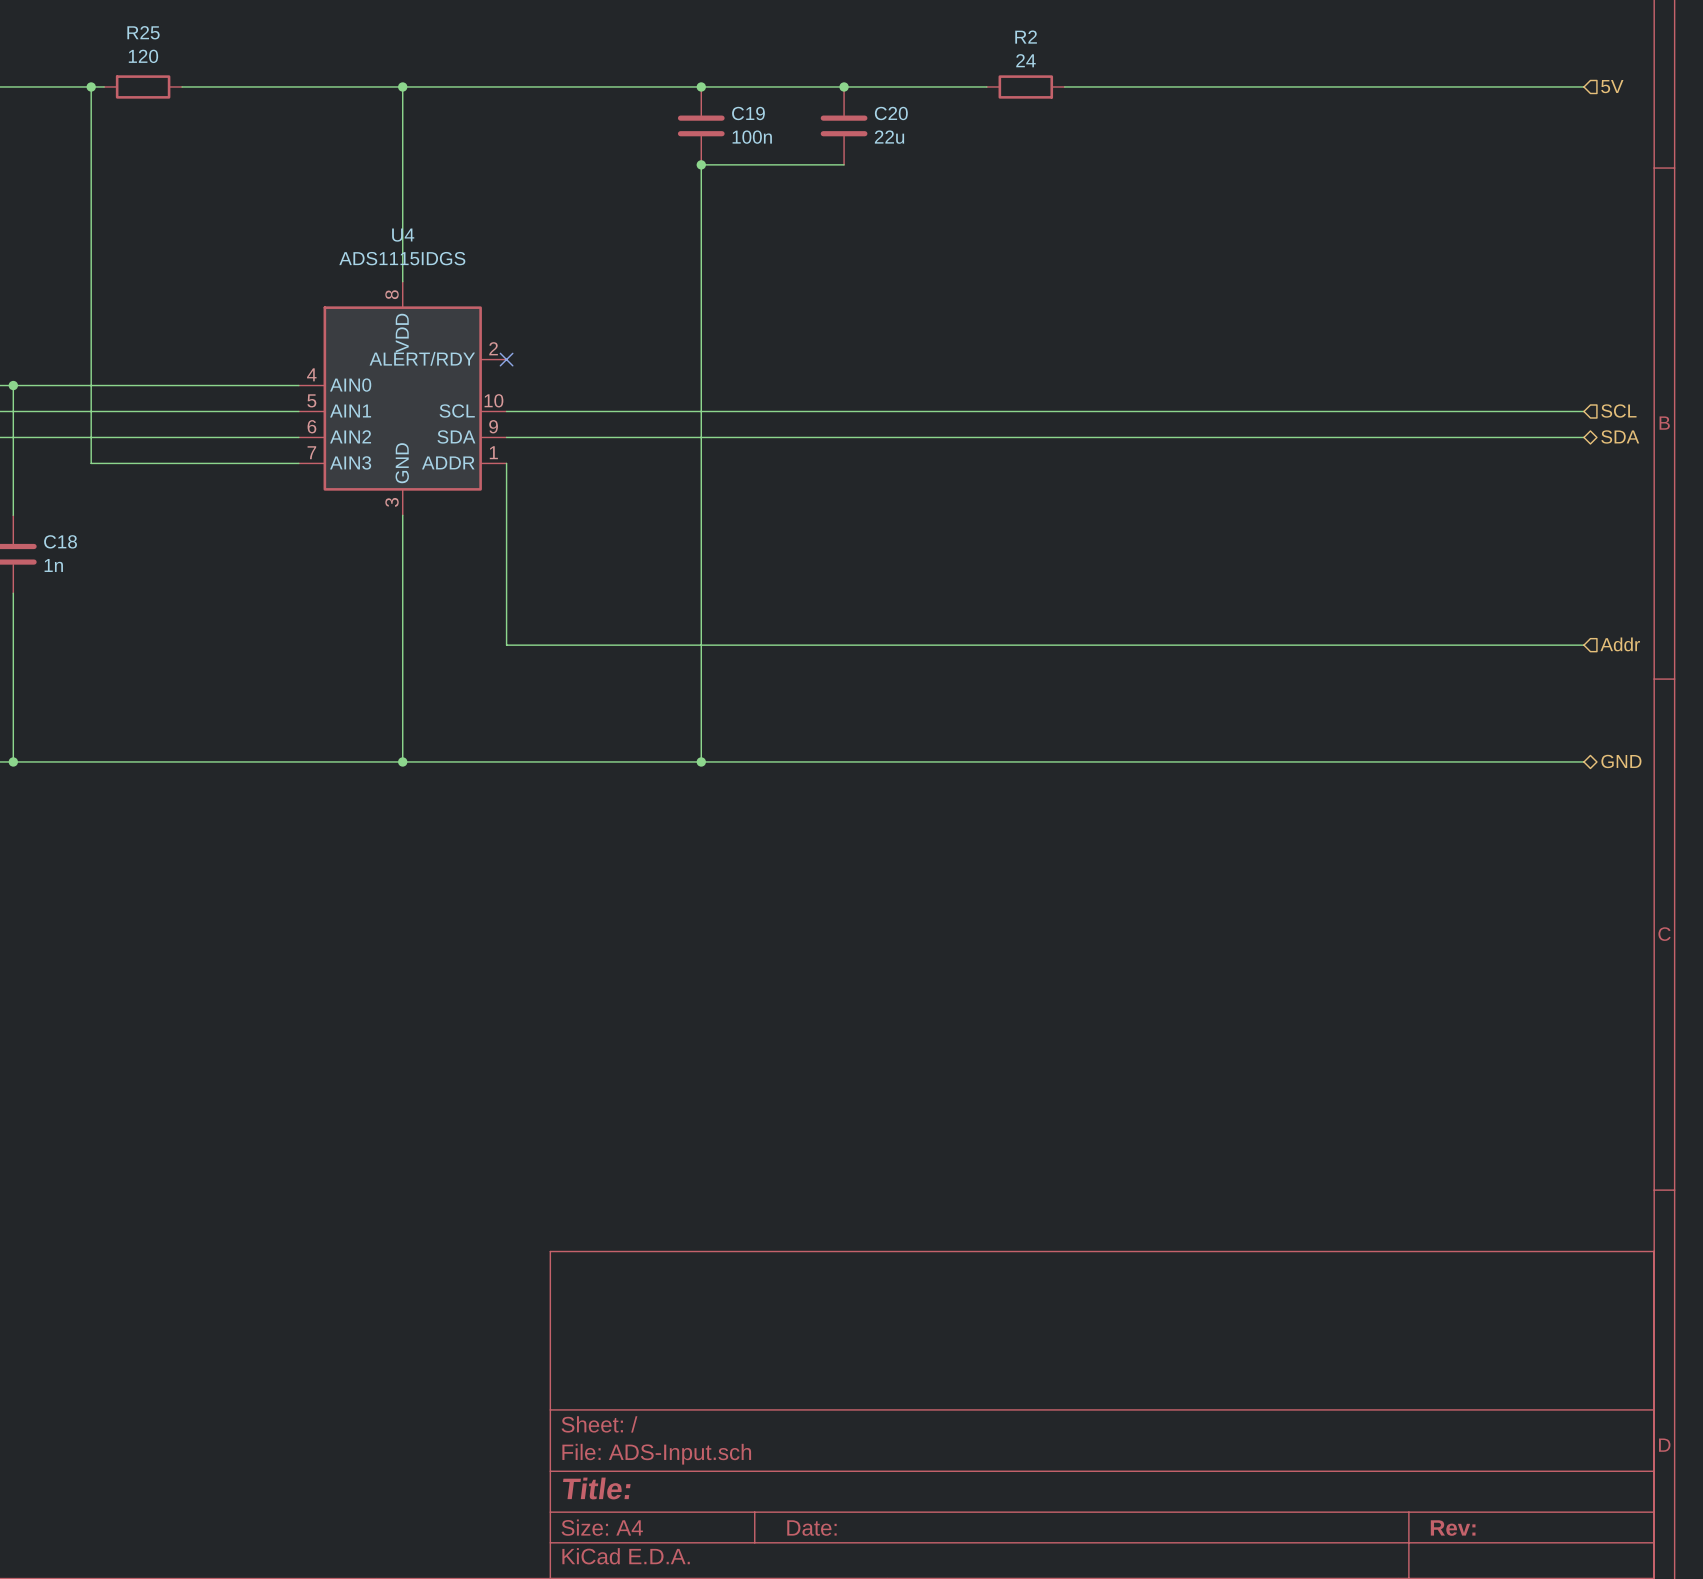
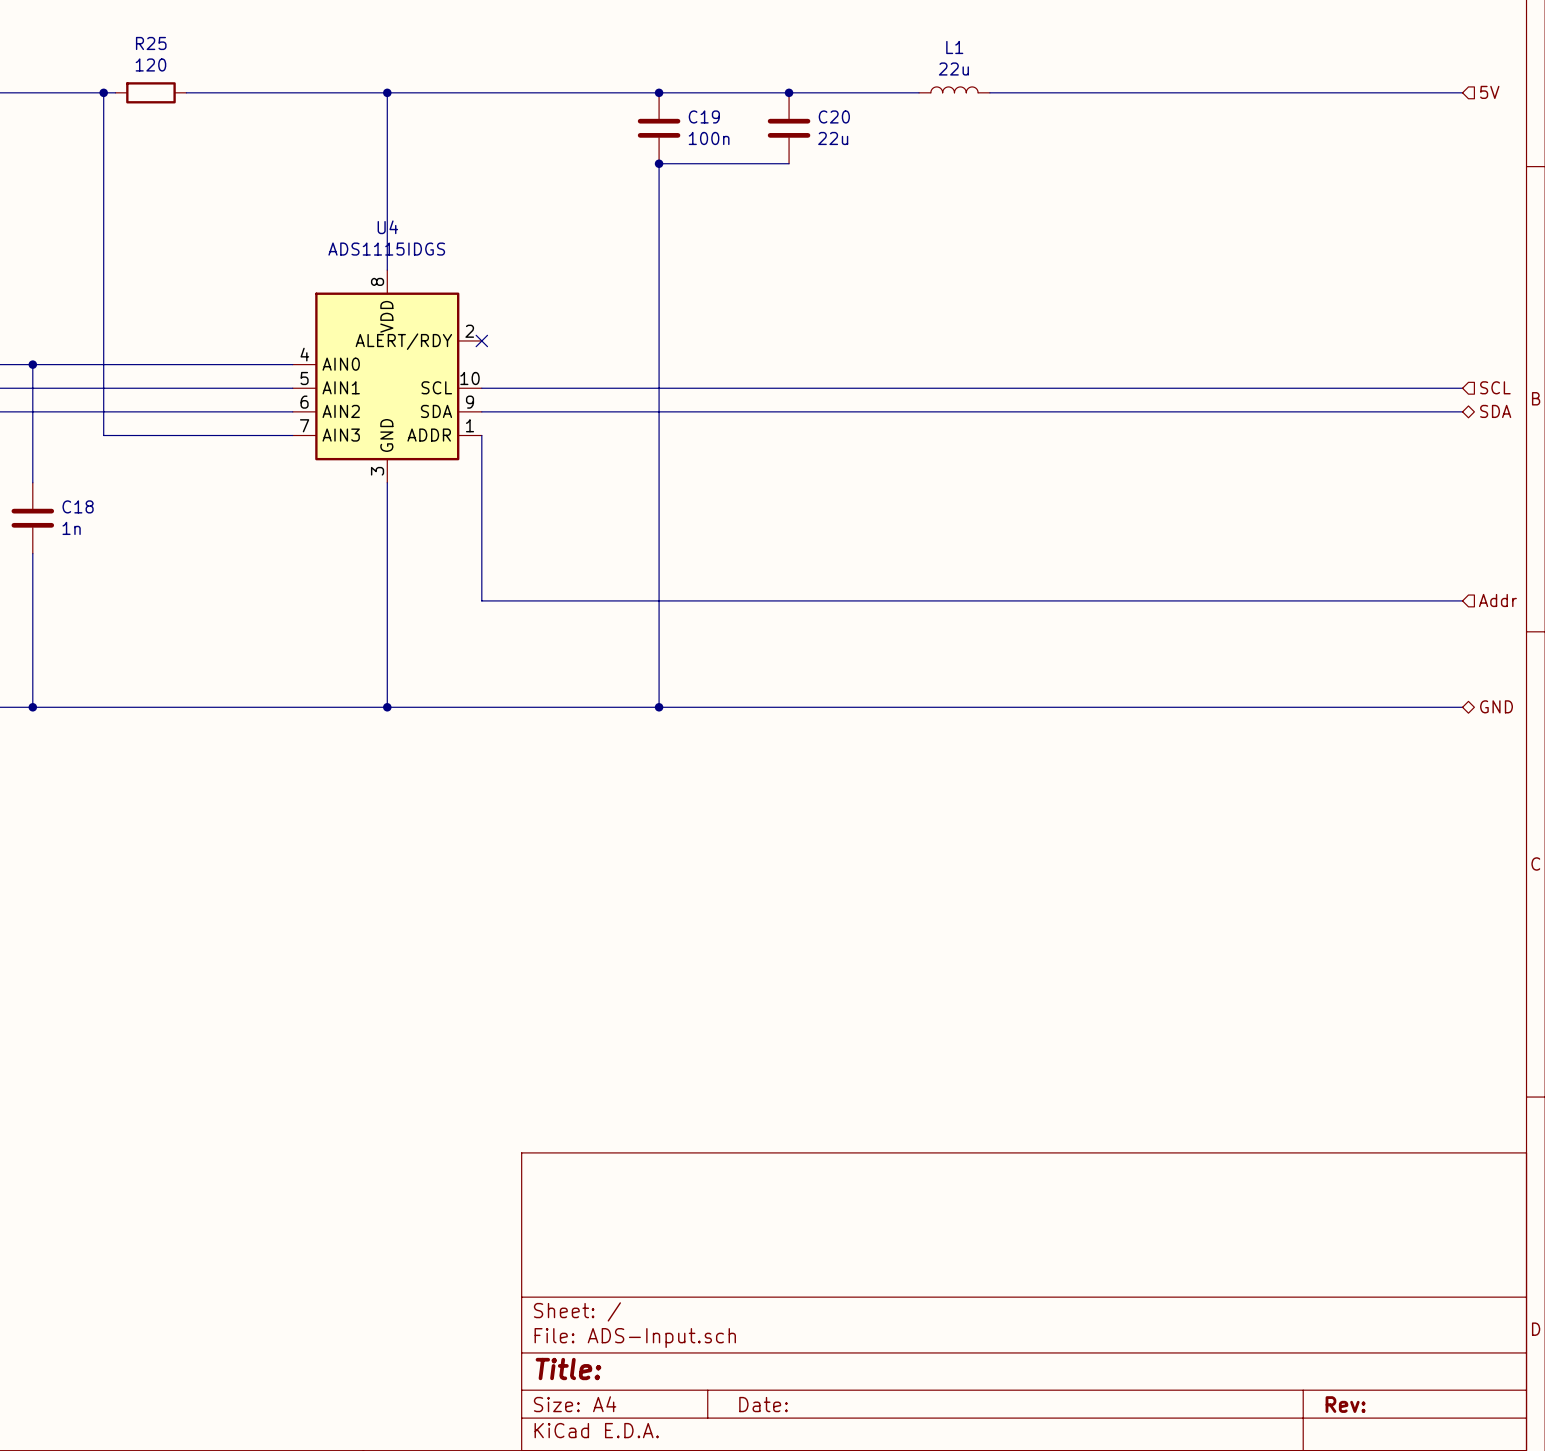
L1: none -> 22u (954, 89)
R2: 24 (1025, 86) -> none

